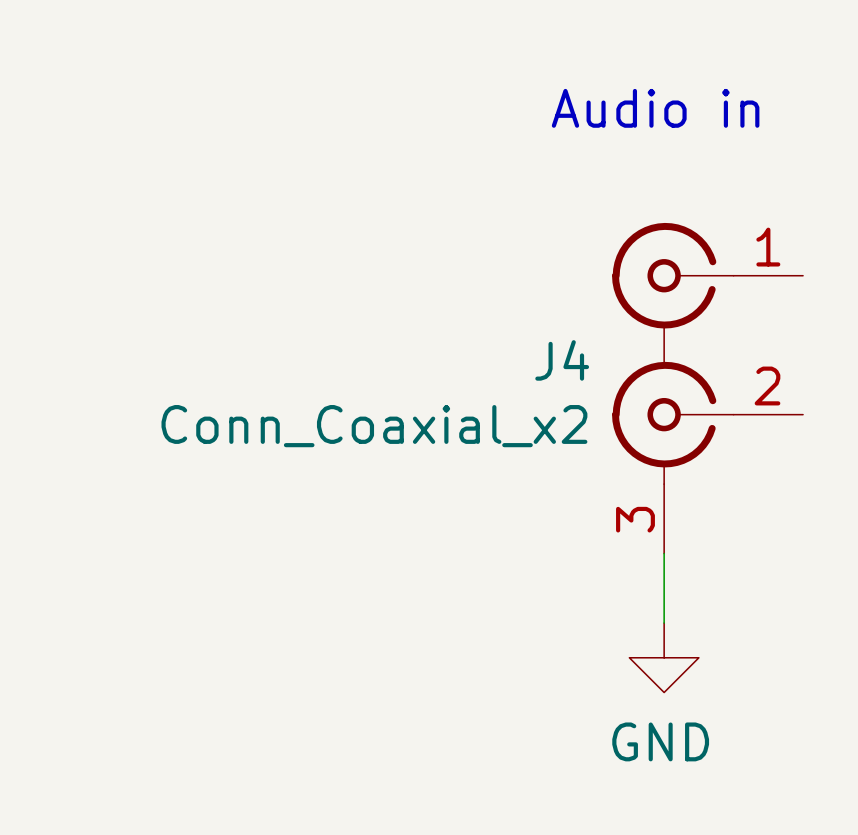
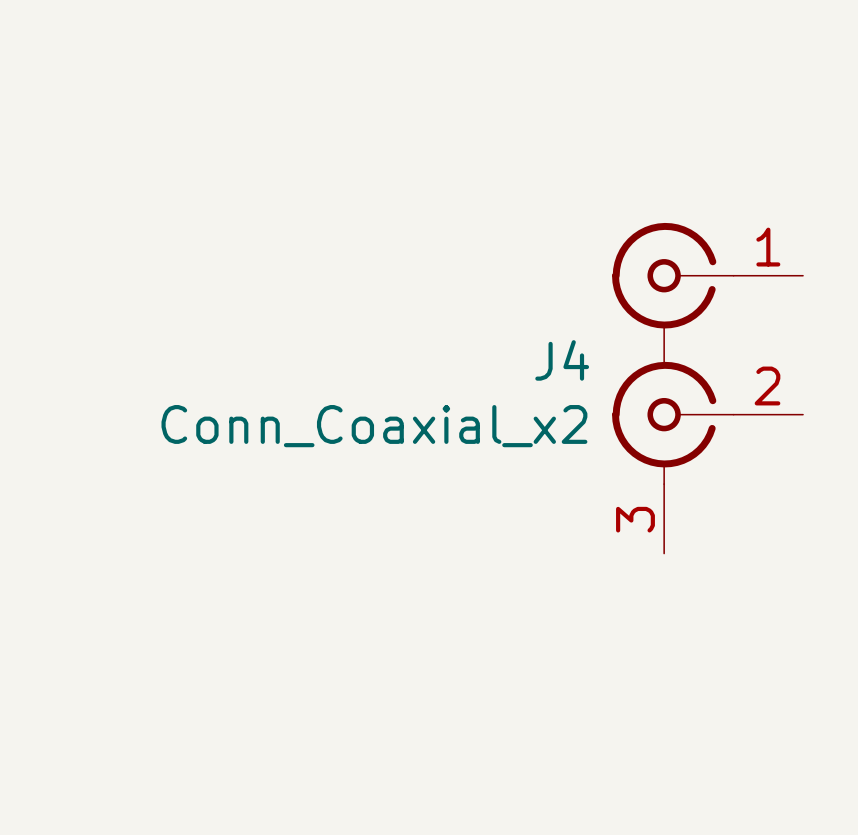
text: Audio in (655, 108) -> none
wire: (664, 553) (664, 623) -> none
power symbol: GND (664, 657) -> none

